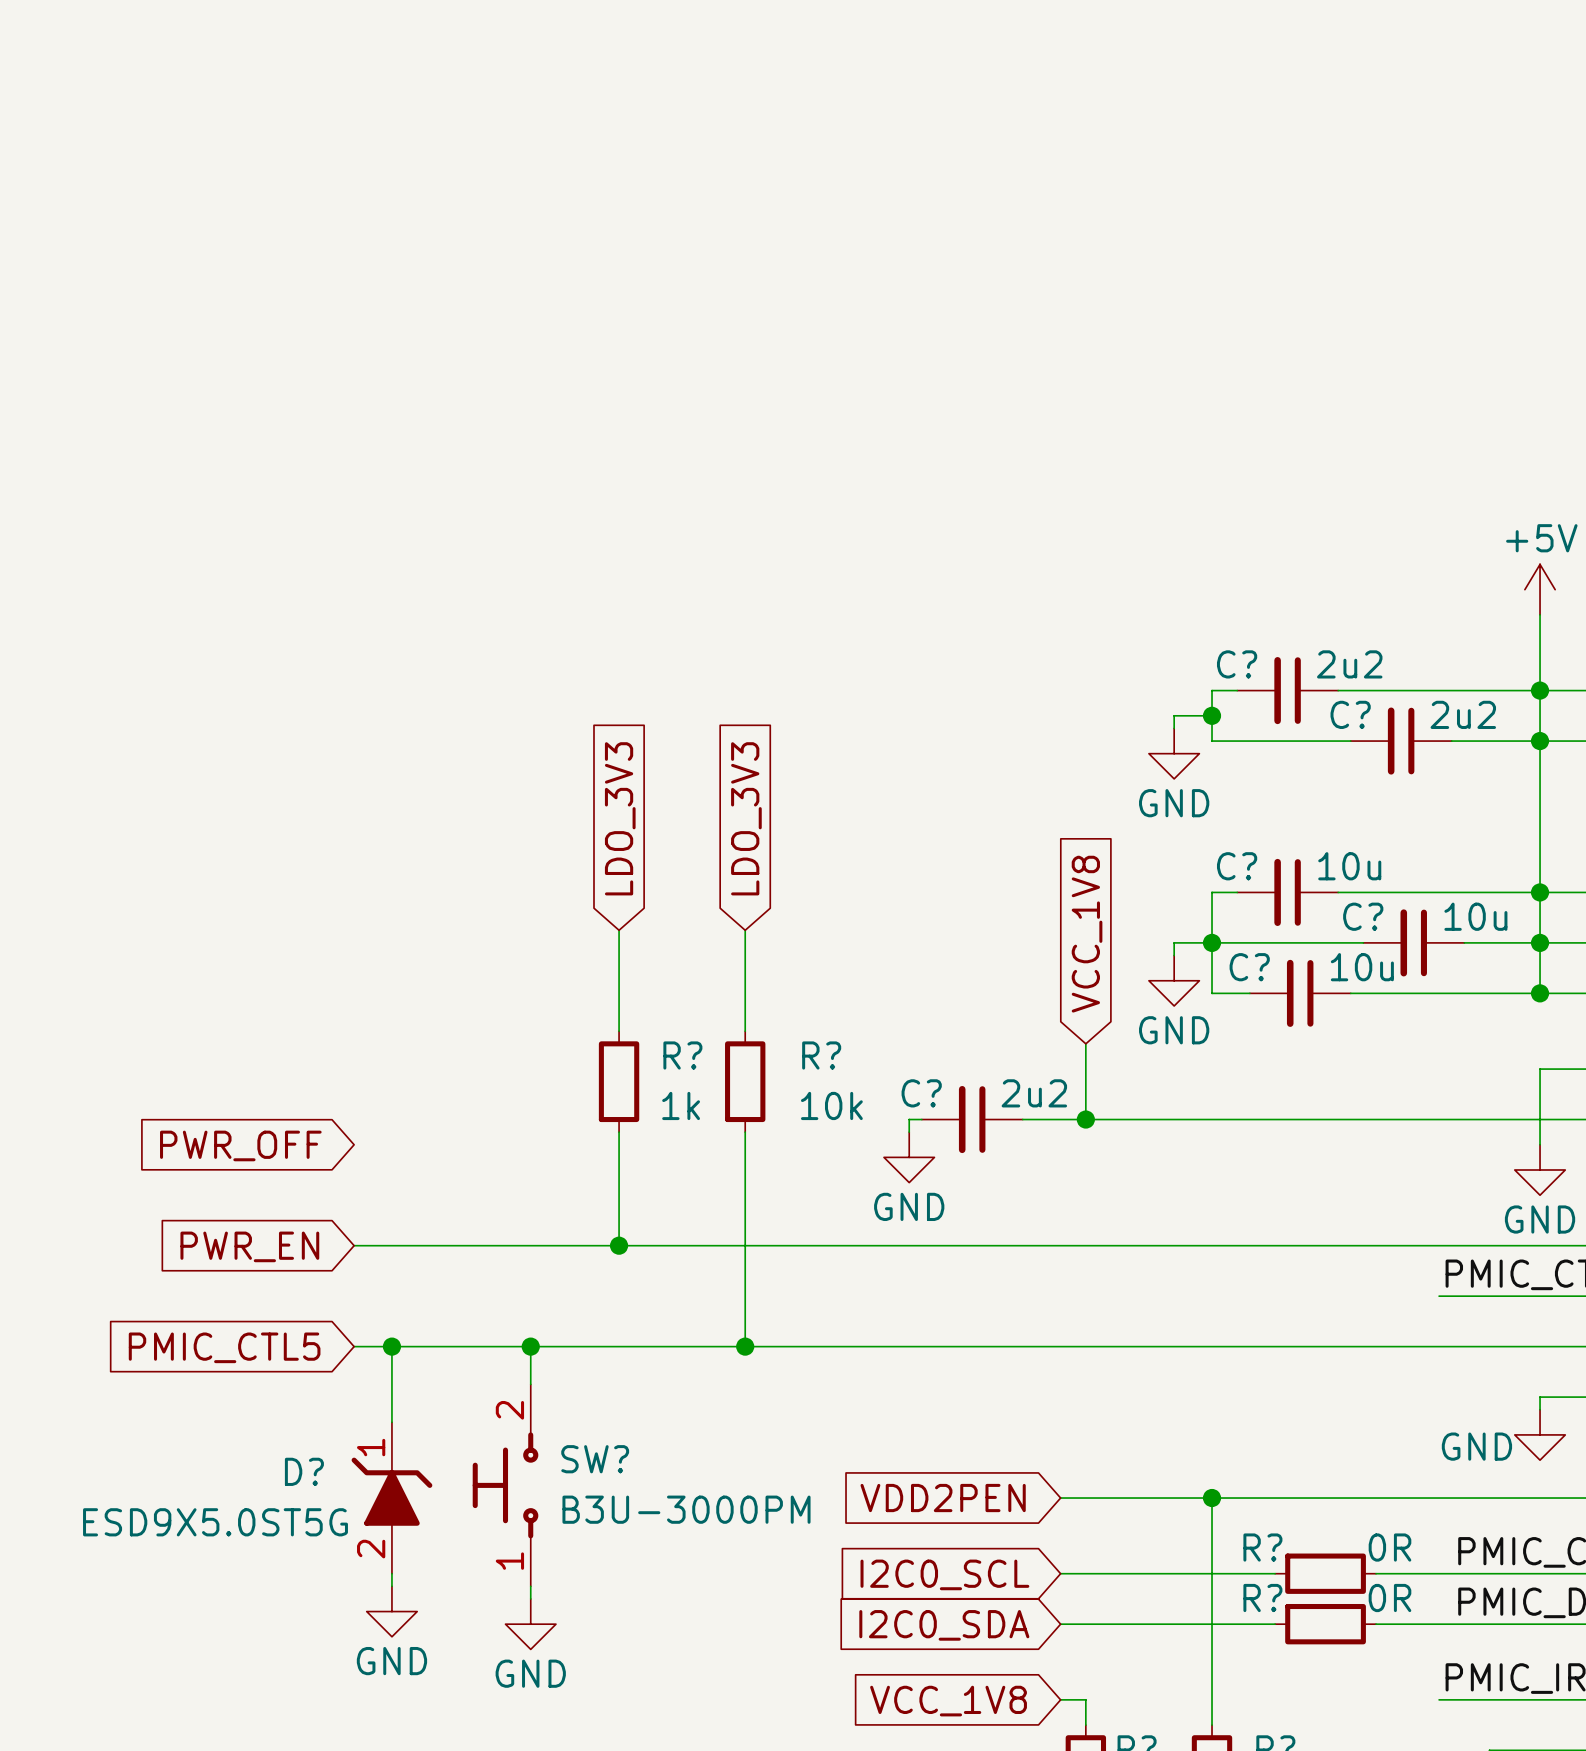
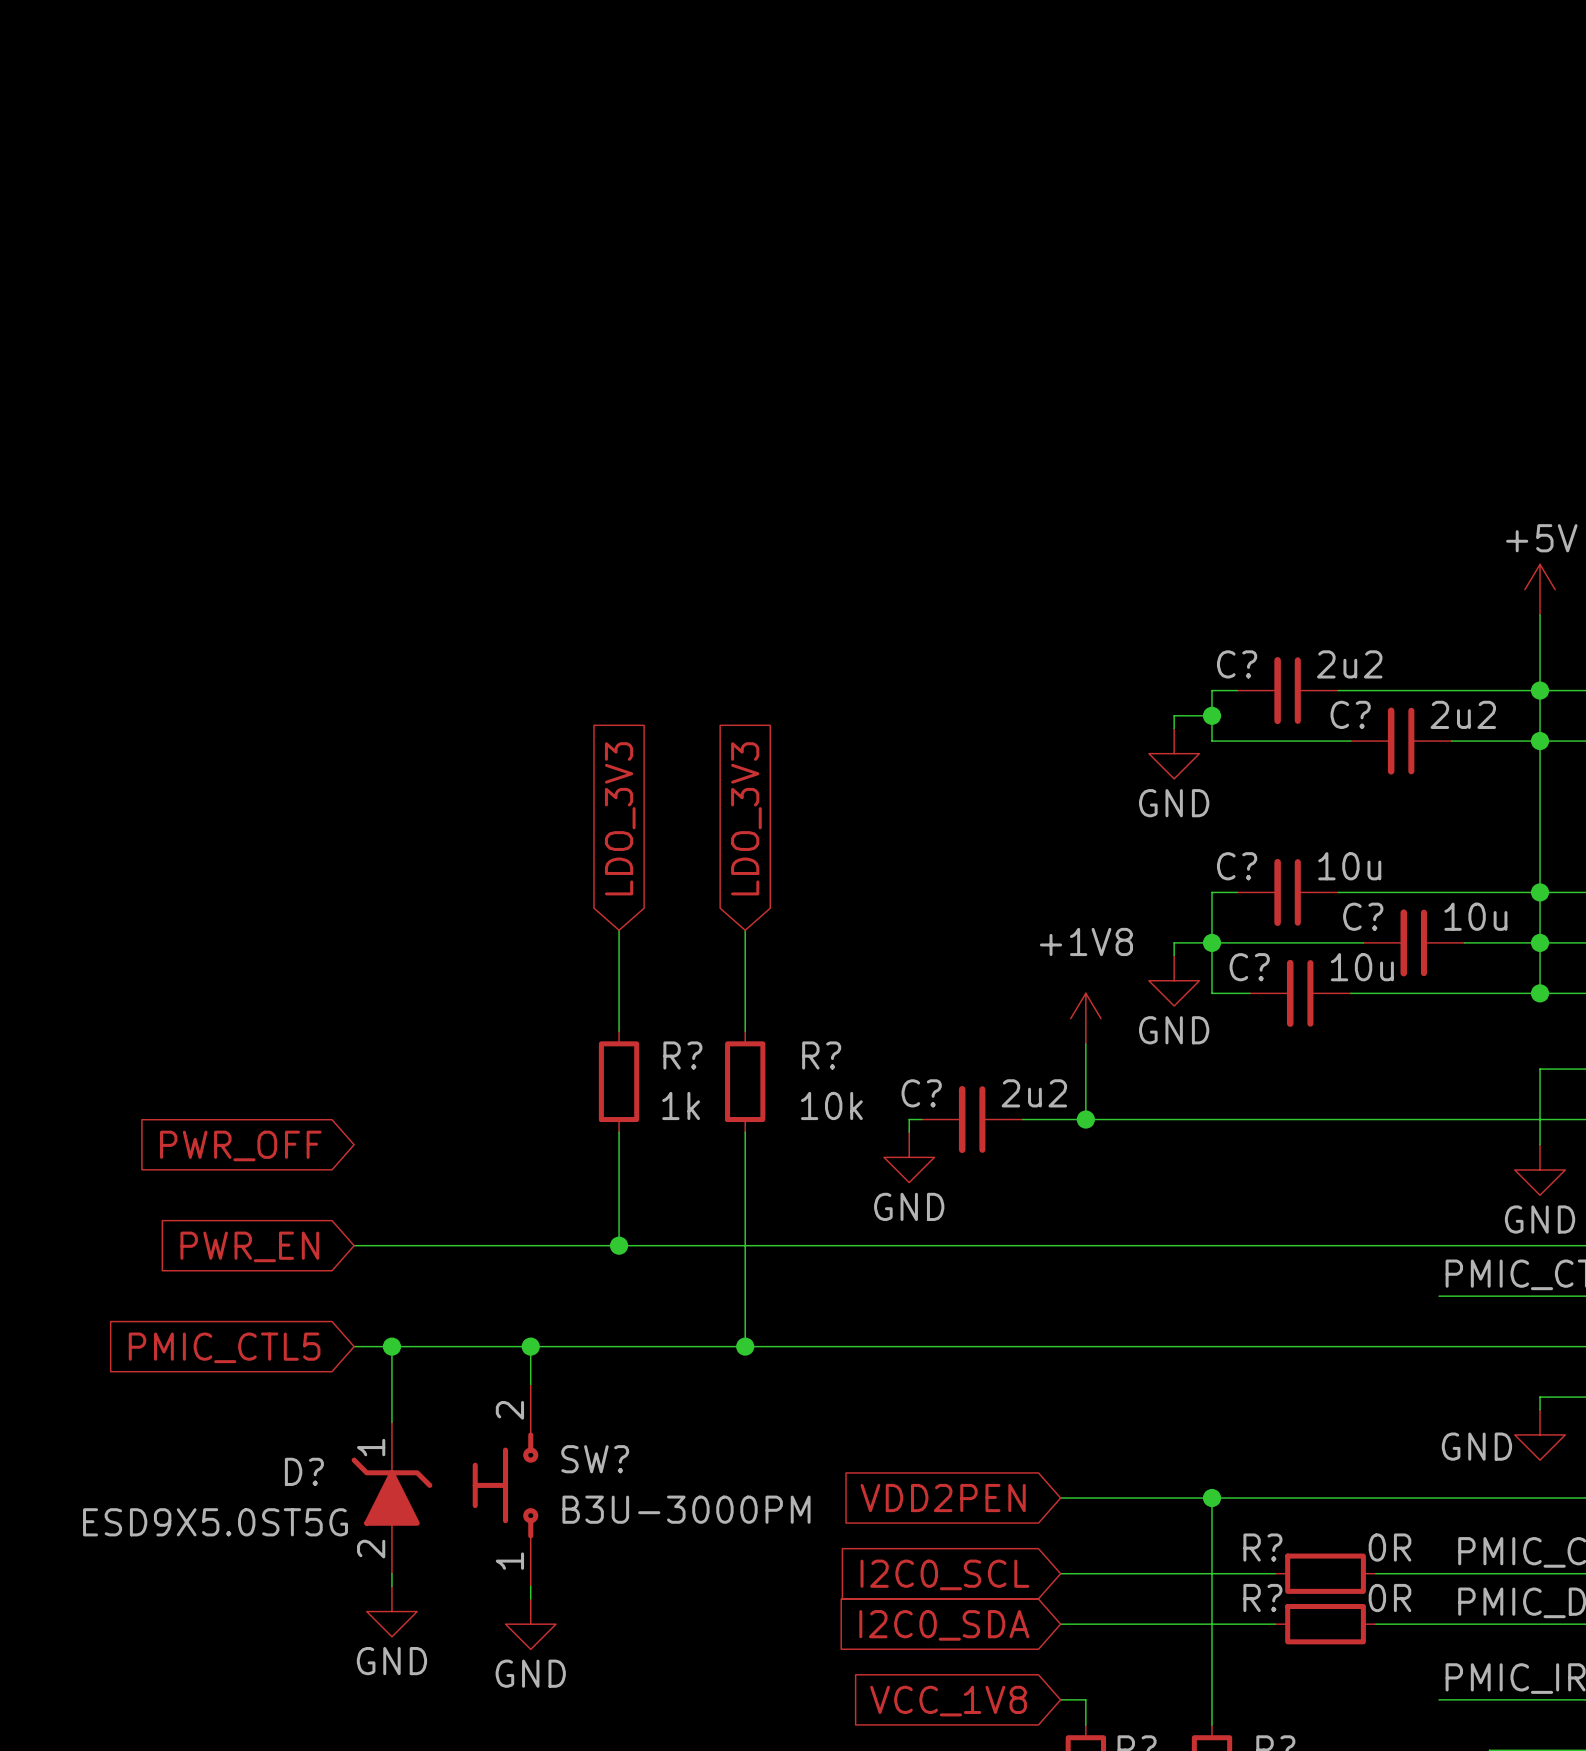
global label: VCC_1V8 (1087, 934) -> none
power symbol: none -> +1V8 (1085, 1018)

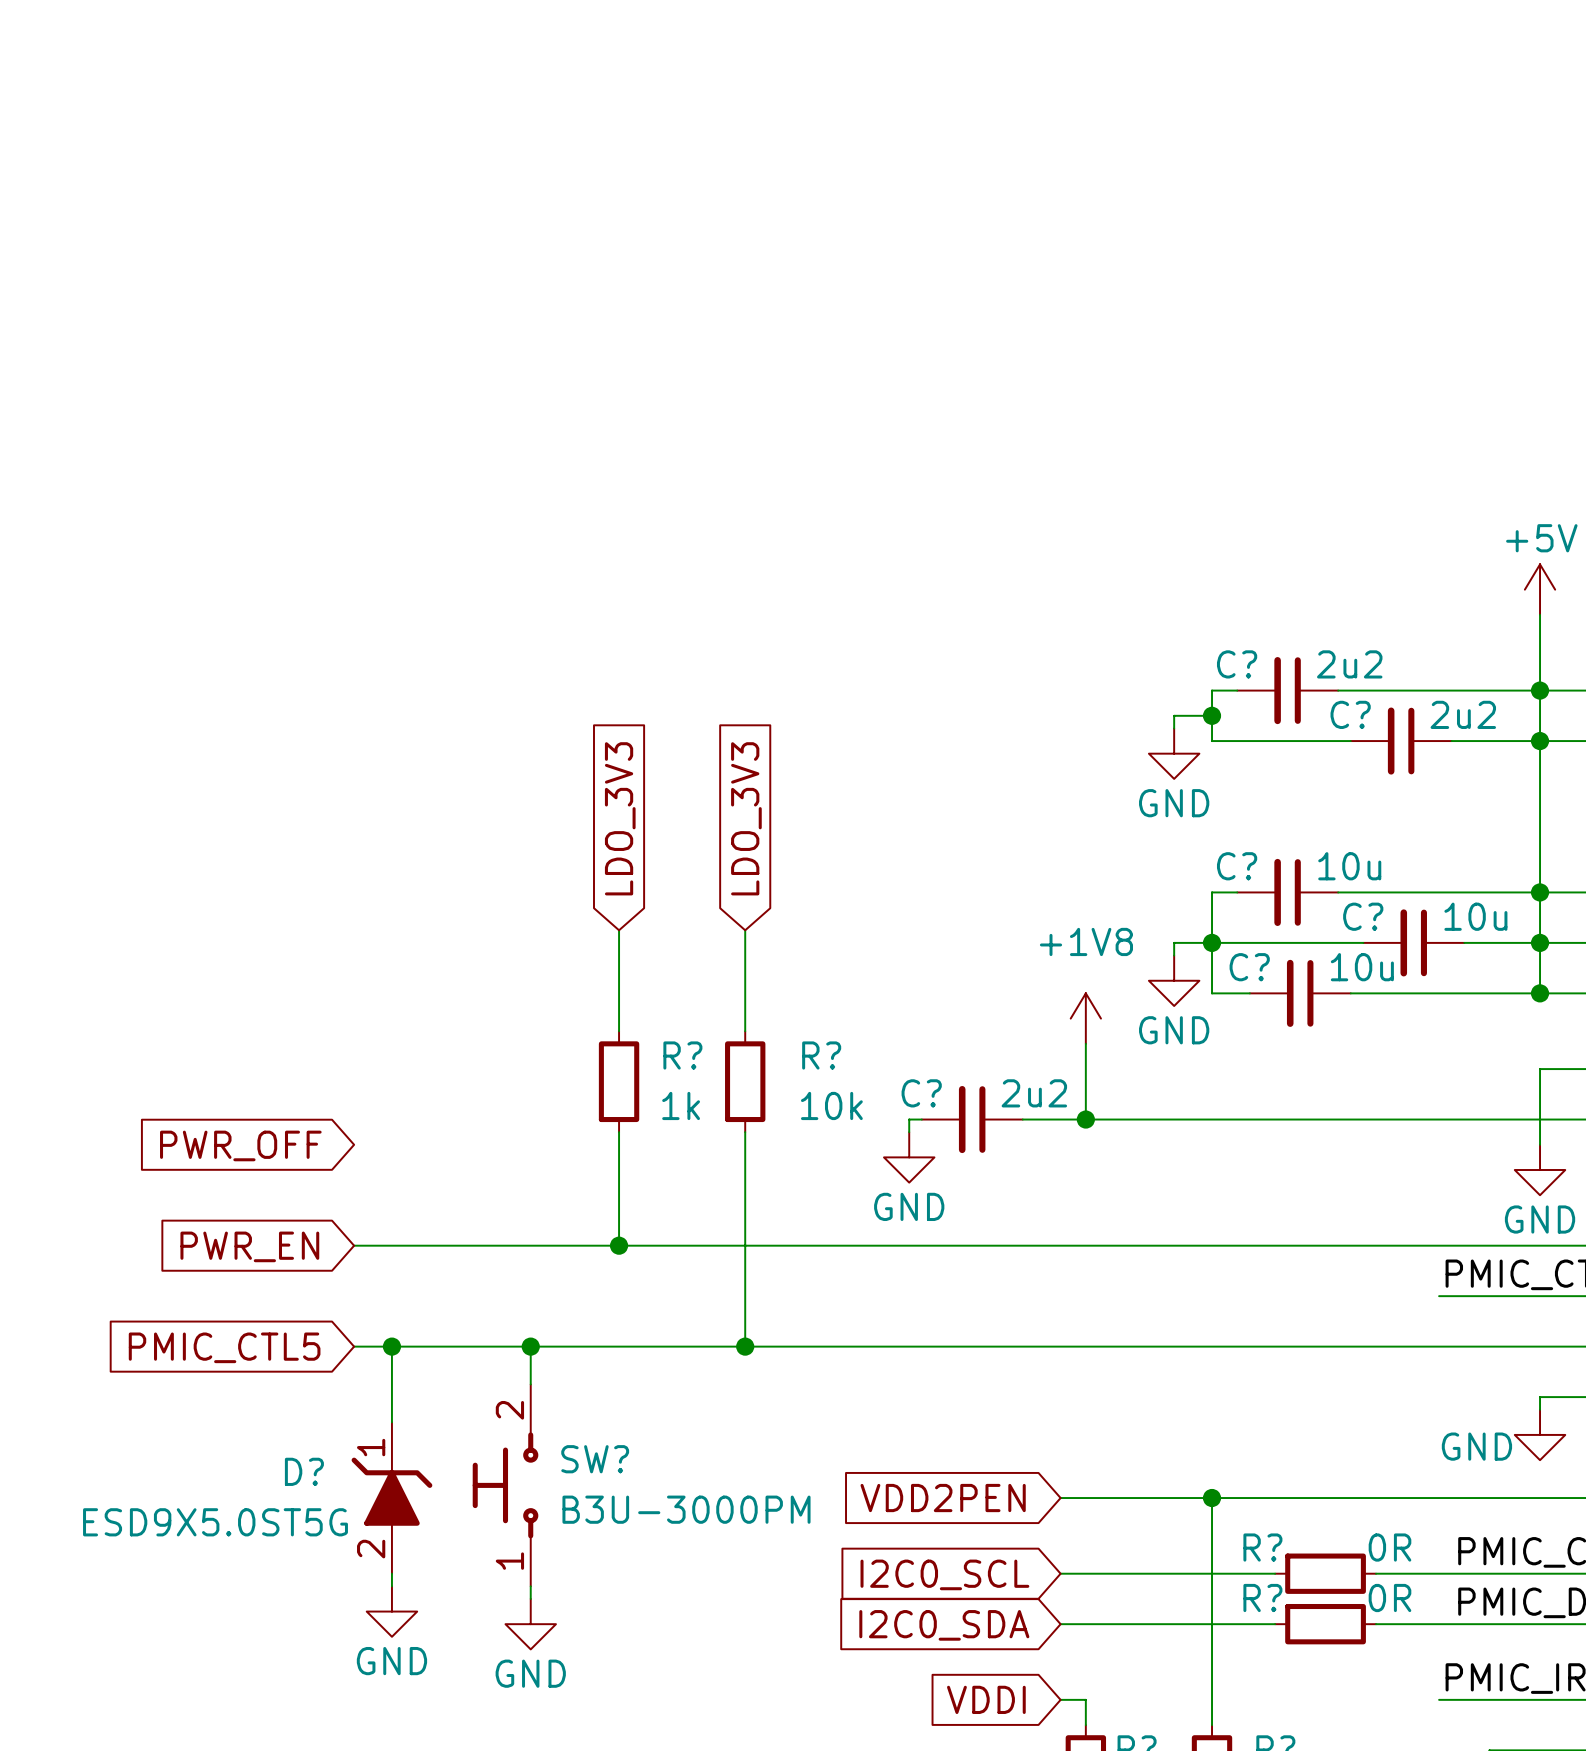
global label: VCC_1V8 (948, 1701) -> VDDI (986, 1699)

